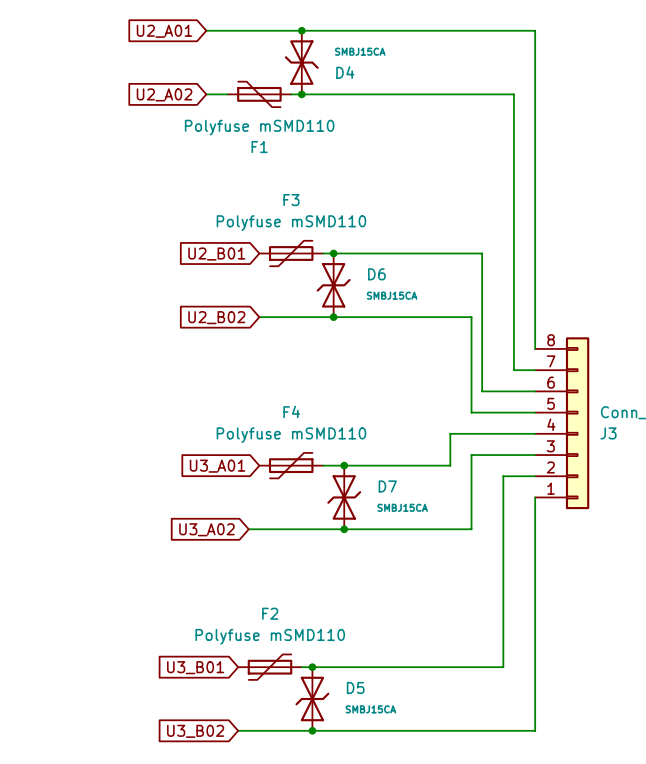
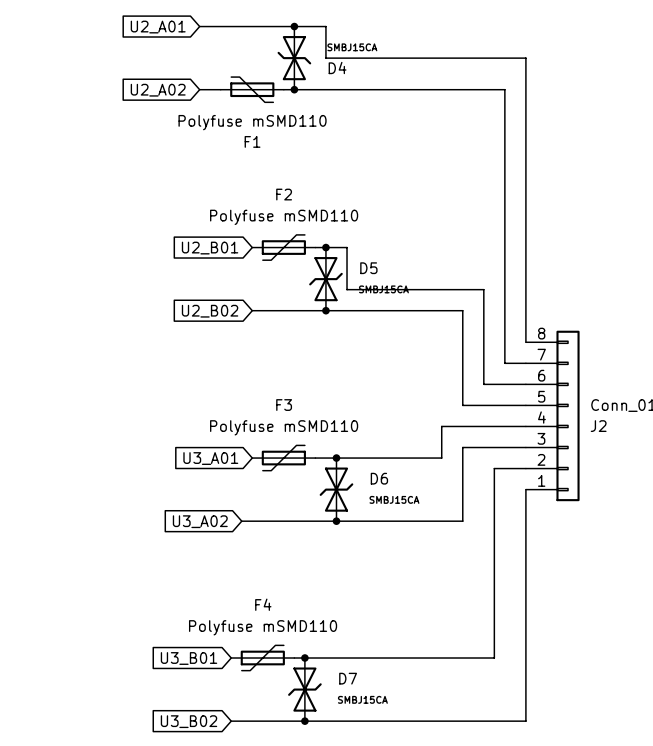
wire: (333, 30) (535, 30) (535, 62) -> (325, 26) (325, 58) (525, 58)
F3 name: F3 (291, 200) -> F2 (284, 194)
wire: (354, 253) (482, 253) (482, 391) (492, 391) -> (347, 247) (347, 289) (483, 289) (483, 384)
D6 name: D6 (376, 274) -> D5 (368, 268)
F4 name: F4 (291, 411) -> F3 (284, 405)
J3 name: J3 (608, 433) -> J2 (598, 426)
D7 name: D7 (387, 486) -> D6 (379, 478)
F2 name: F2 (270, 613) -> F4 (263, 604)
D5 name: D5 (355, 687) -> D7 (348, 678)

